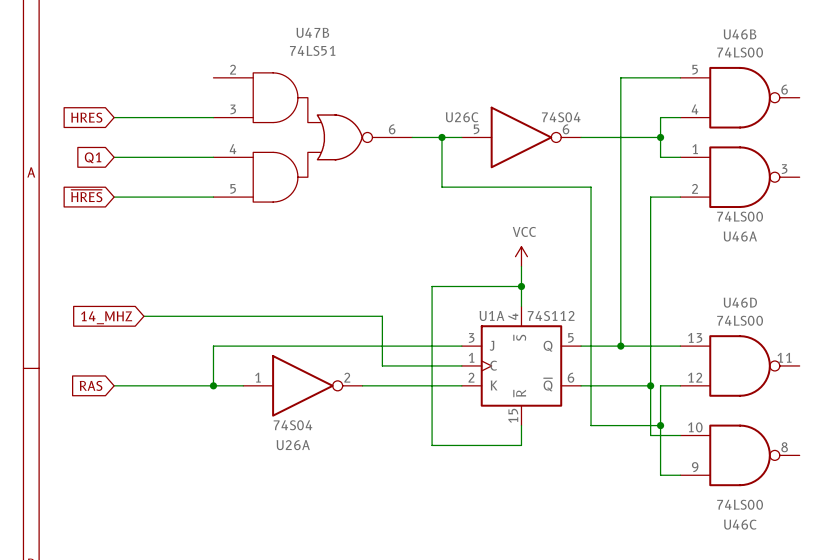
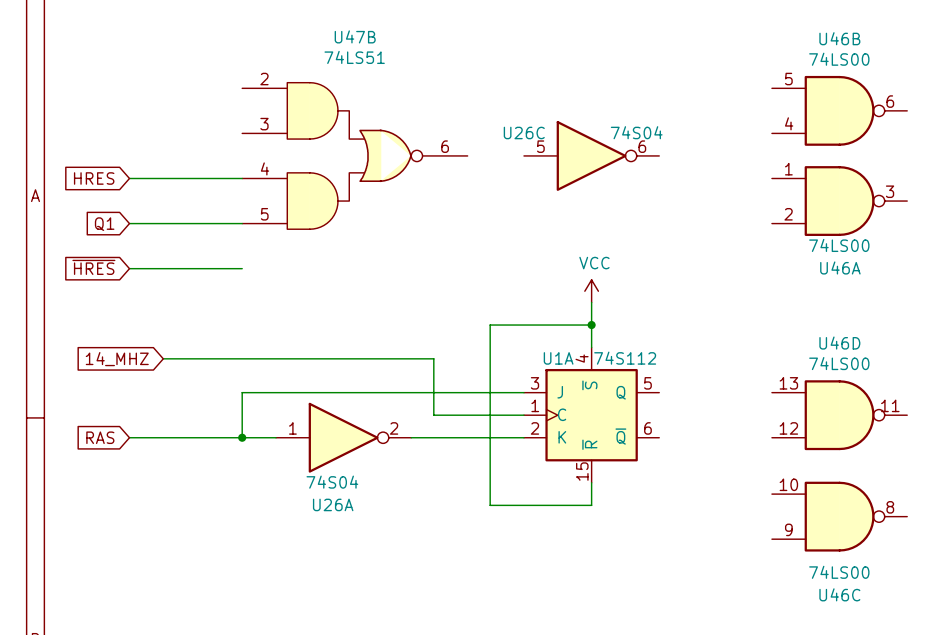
wire: (680, 77) (620, 77) (620, 346) -> none
global label: HRES (86, 117) -> none
wire: (114, 117) (213, 117) -> (129, 268) (242, 268)
wire: (680, 117) (660, 117) (660, 157) (680, 157) -> none
wire: (412, 137) (461, 137) -> none
wire: (441, 137) (441, 187) (591, 187) (591, 425) (660, 425) -> none
junction: (441, 137) -> none
wire: (581, 137) (660, 137) -> none
junction: (660, 137) -> none
global label: Q1 (93, 157) -> HRES (94, 178)
global label: ~{HRES} (86, 195) -> Q1 (104, 224)
wire: (680, 197) (650, 197) (650, 435) (680, 435) -> none
global label: none -> ~{HRES} (93, 267)
wire: (581, 346) (680, 346) -> none
junction: (620, 346) -> none
wire: (581, 385) (650, 385) -> none
junction: (650, 385) -> none
wire: (680, 385) (660, 385) (660, 475) (680, 475) -> none
junction: (660, 425) -> none

